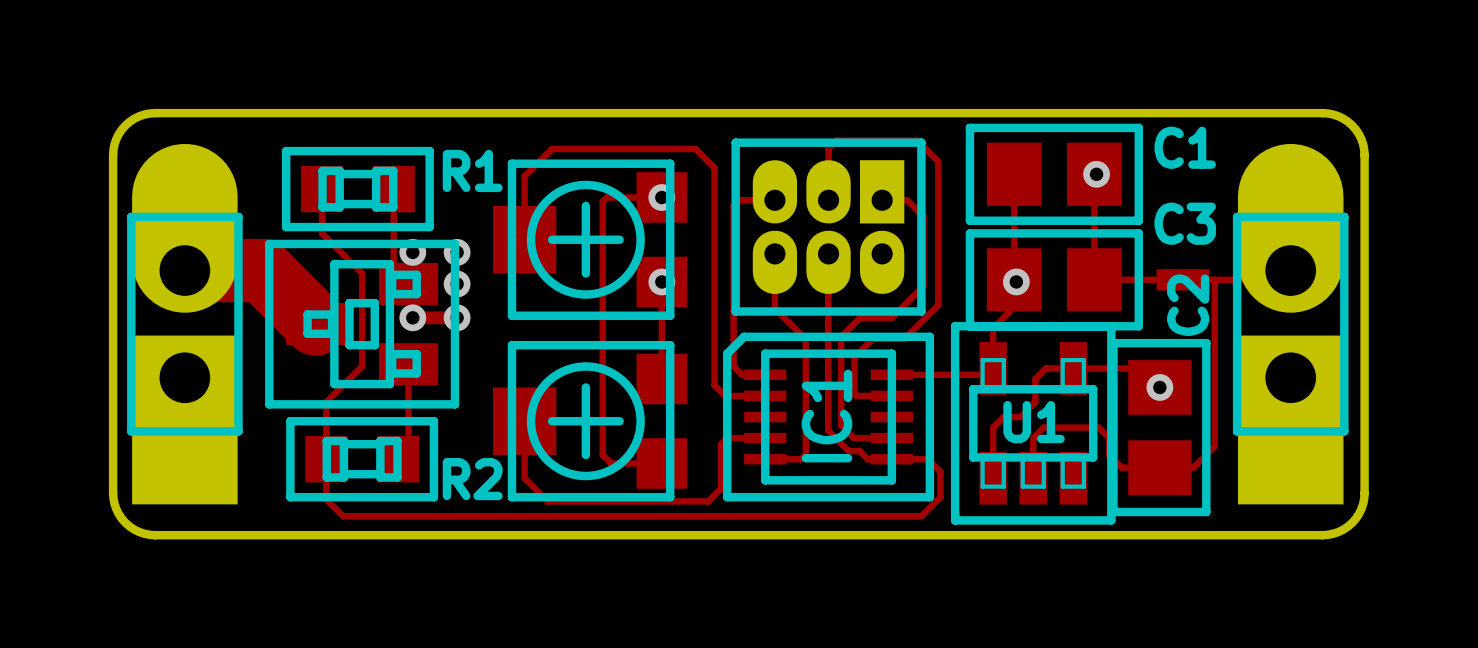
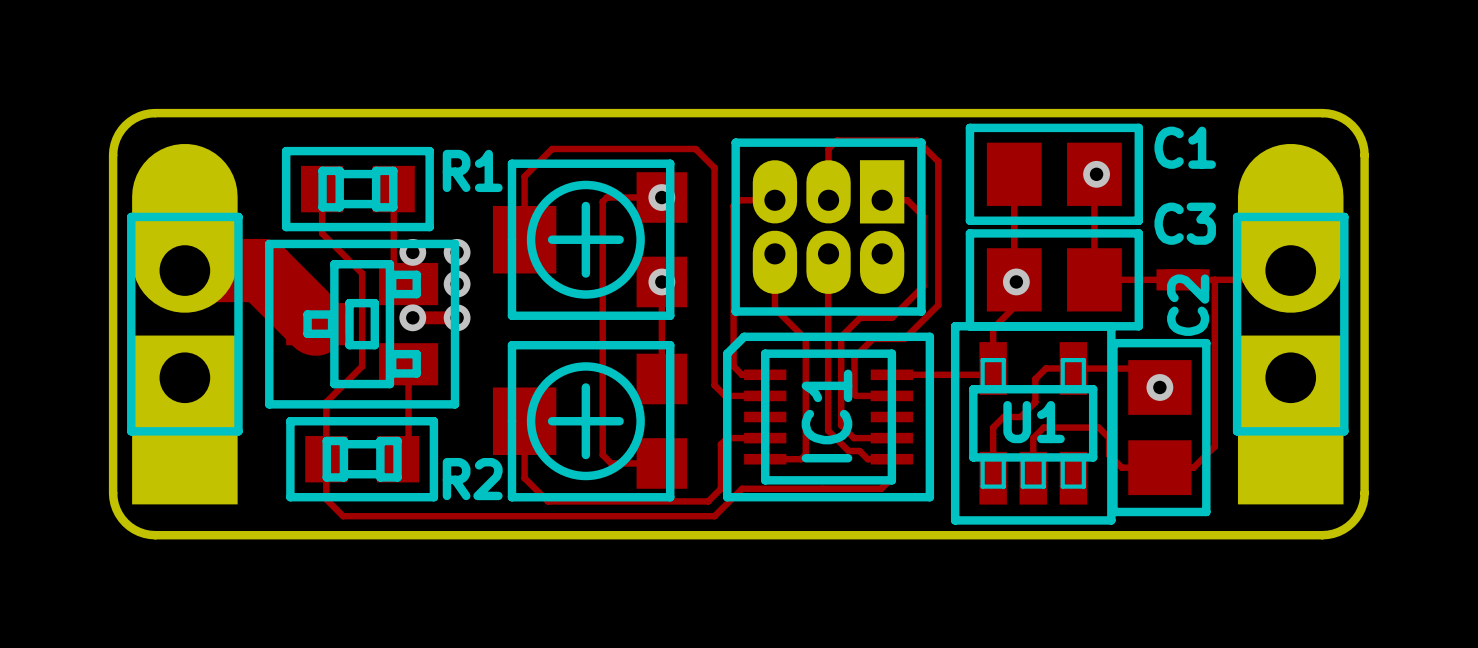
track: (891, 459) (927, 459) (940, 471) (940, 497) (921, 516) (714, 516) -> (891, 459) (891, 478) (881, 488) (742, 488) (714, 516)

